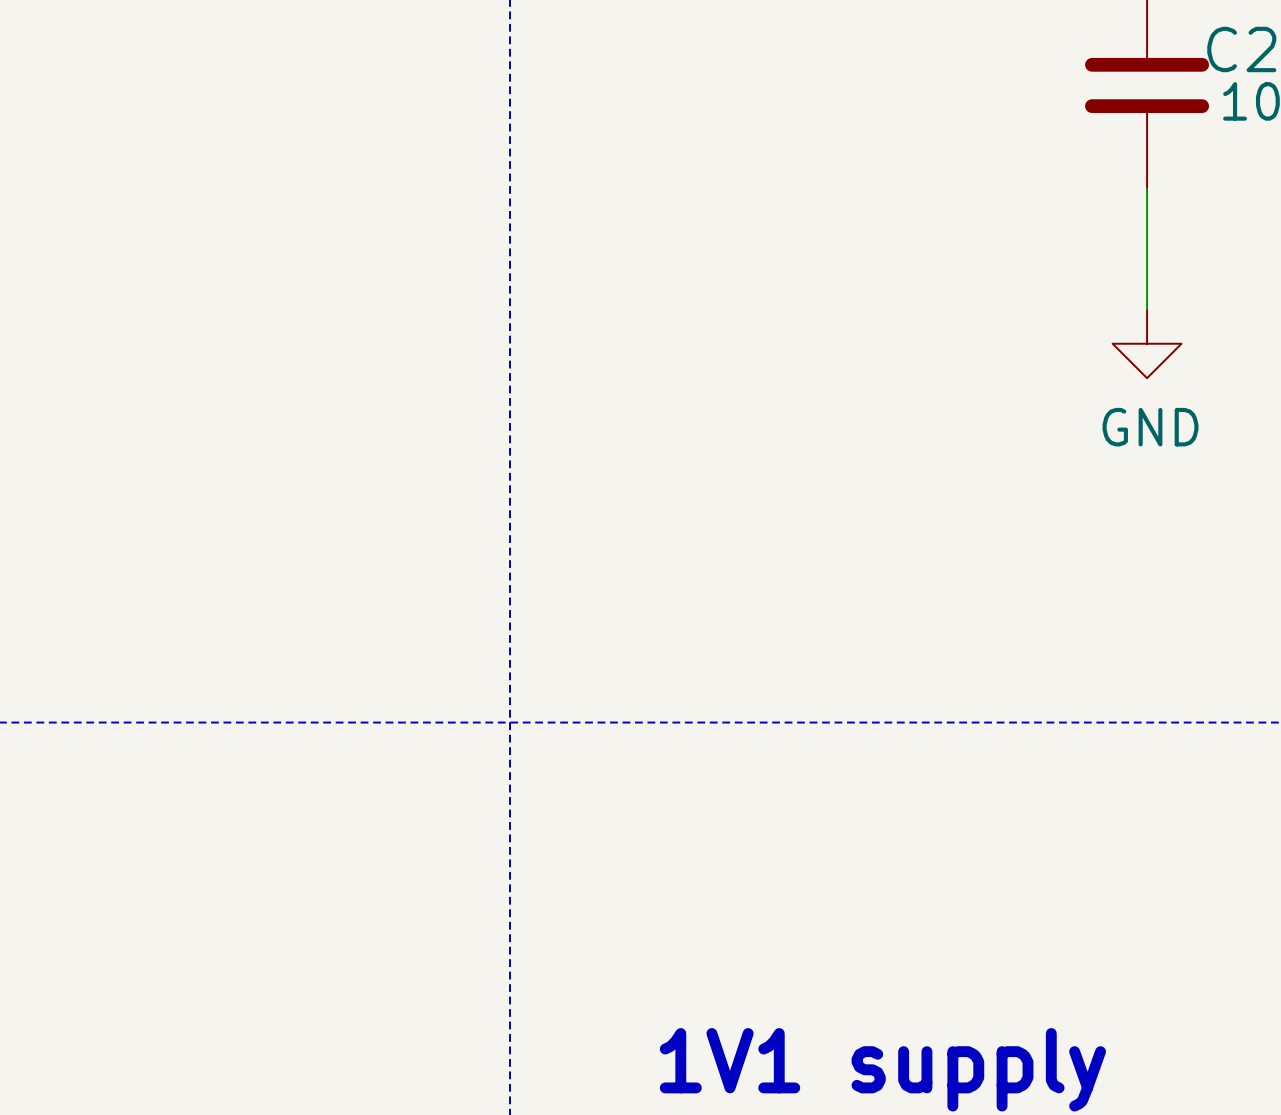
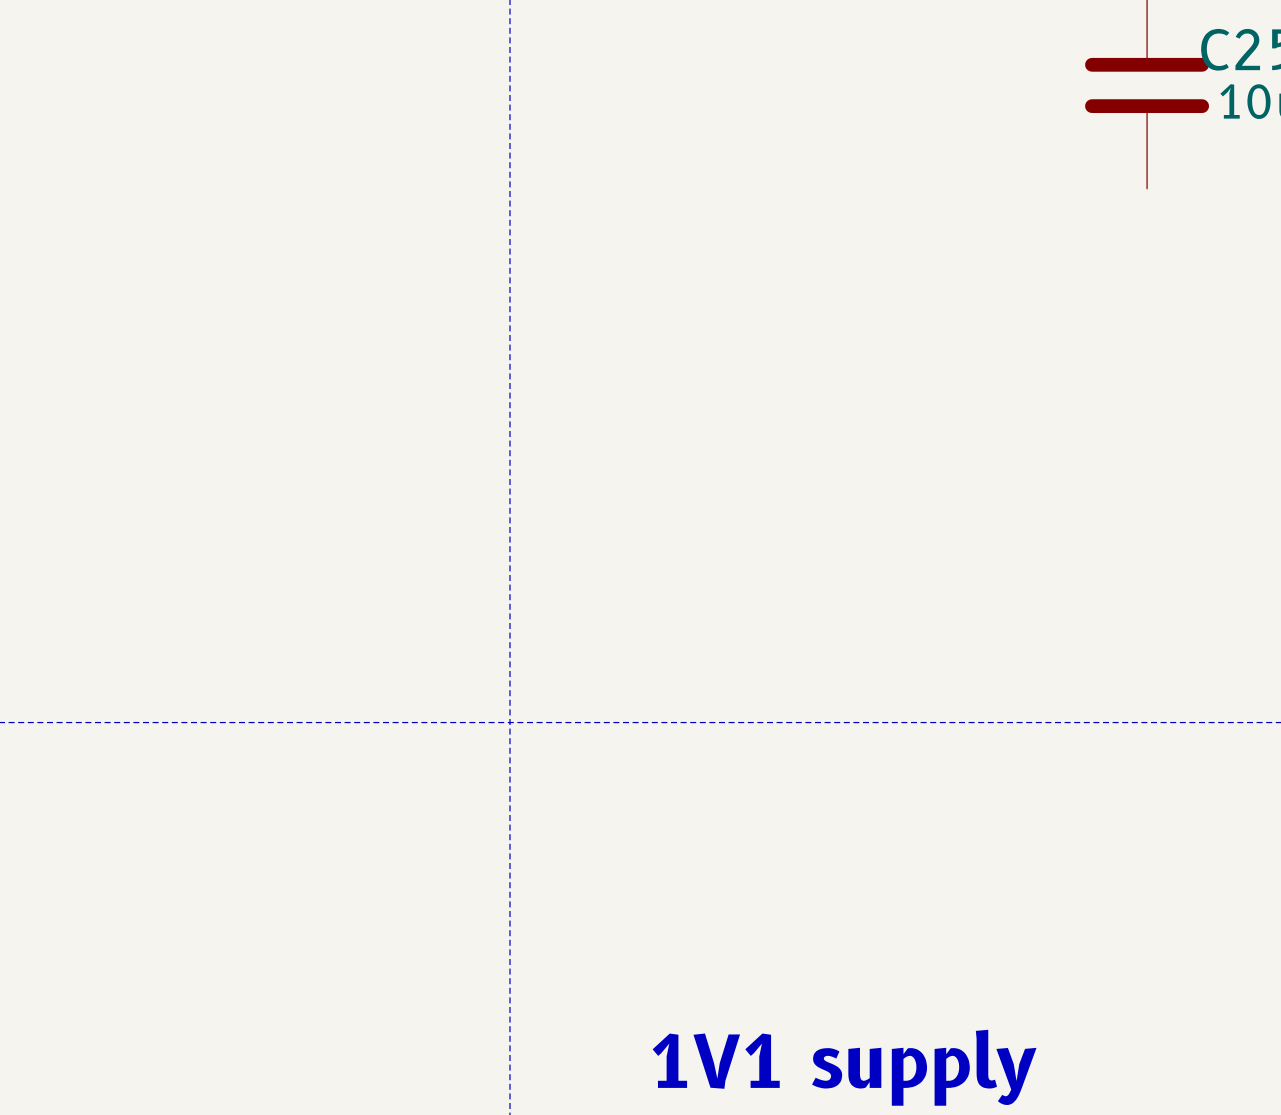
wire: (1147, 188) (1147, 309) -> none
power symbol: GND (1147, 343) -> none

